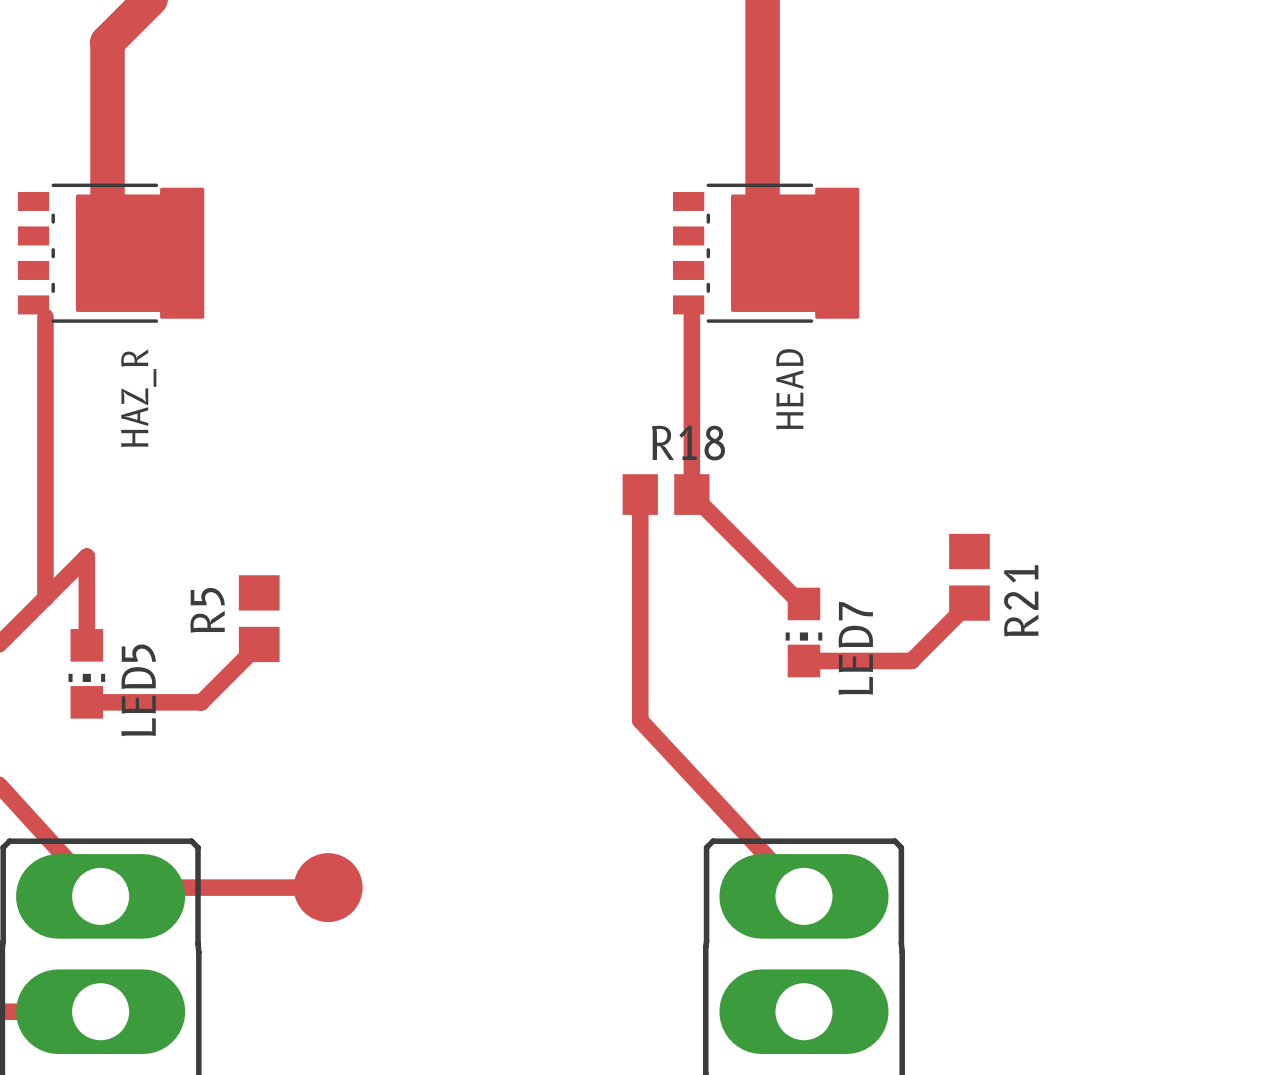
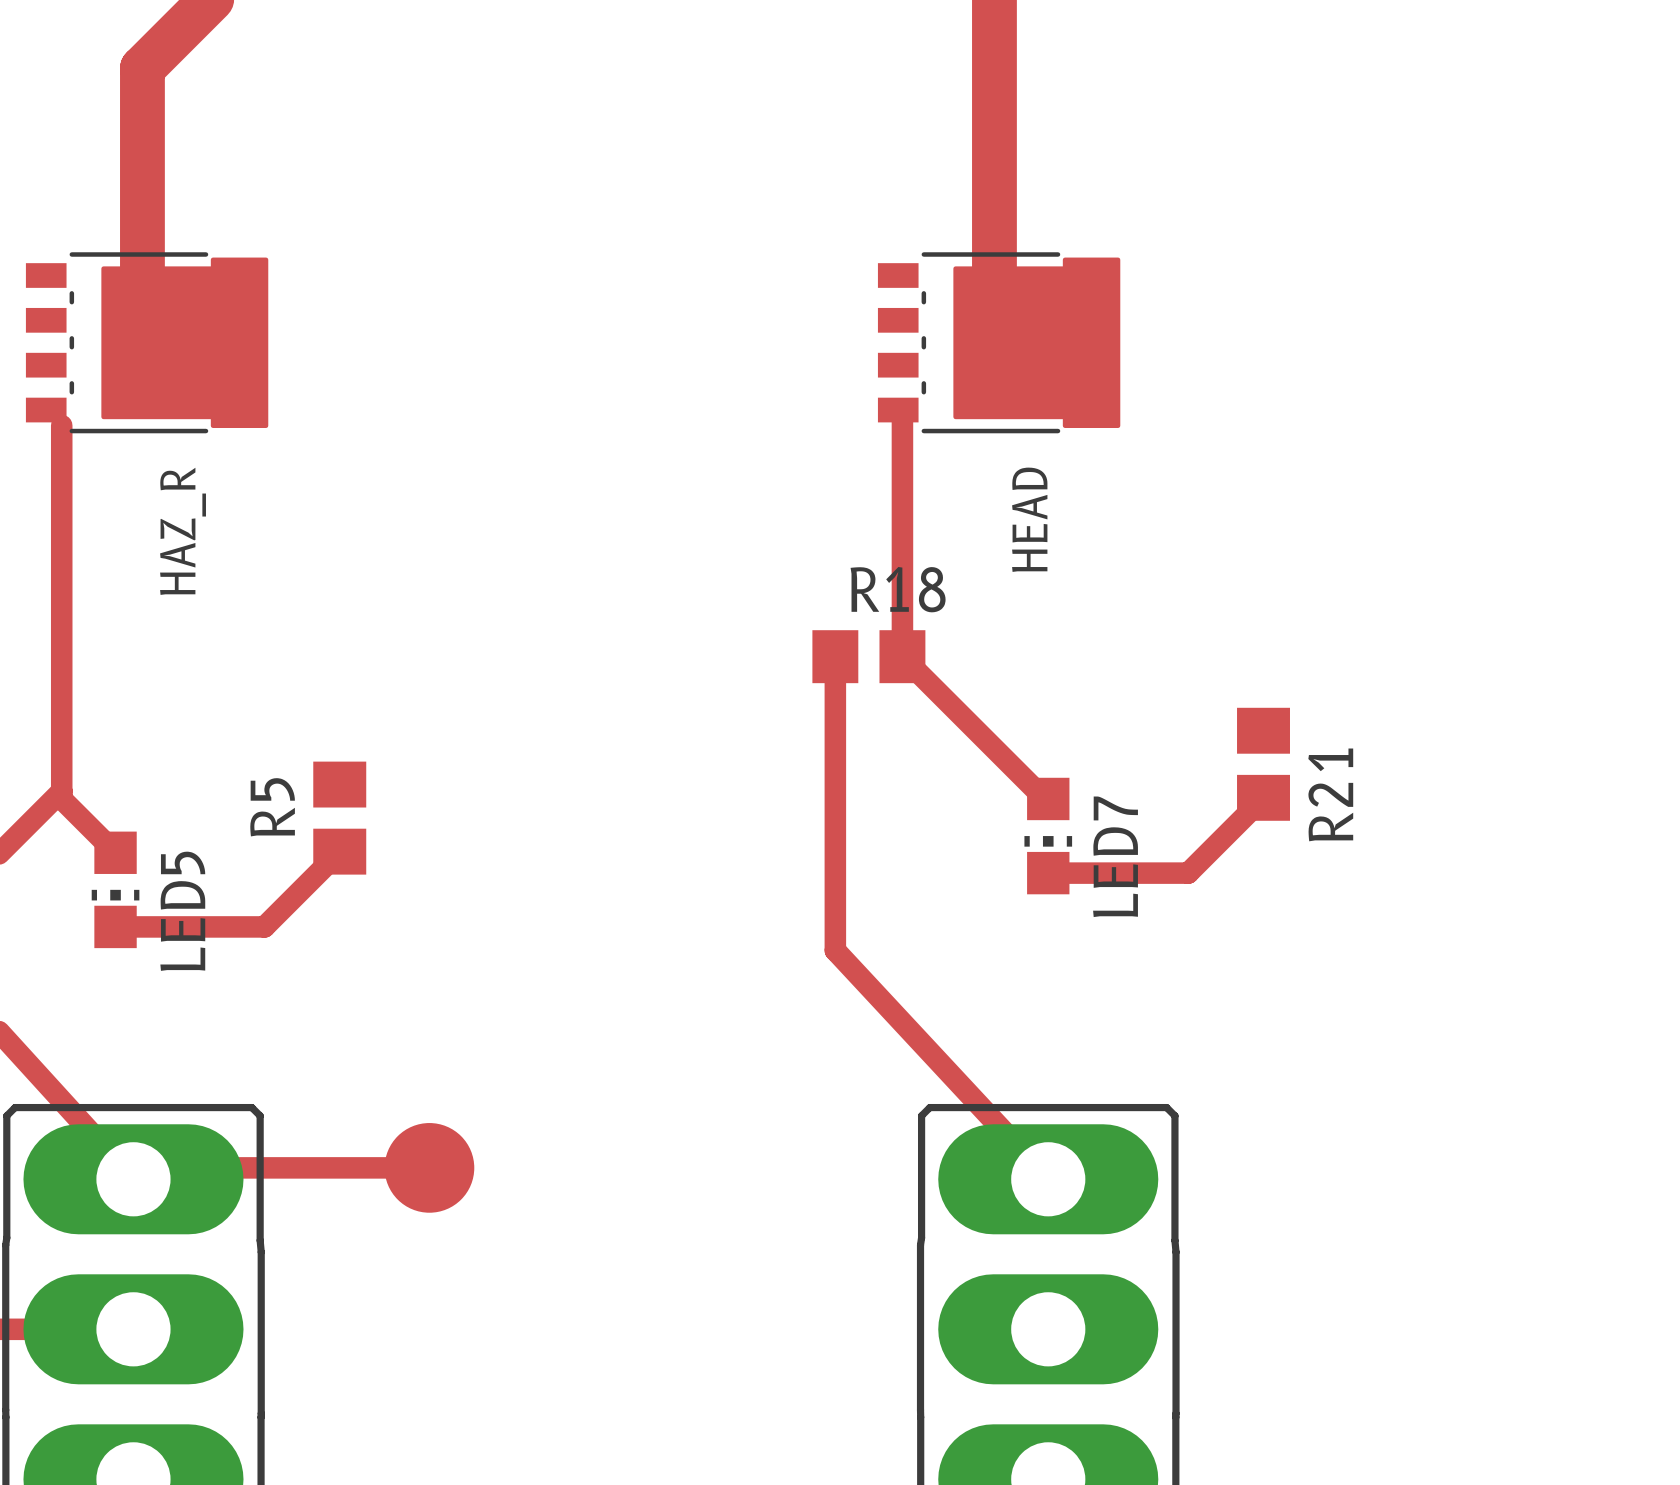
top track: (45, 597) (86, 556) (86, 645) -> (61, 791) (61, 798) (115, 852)

